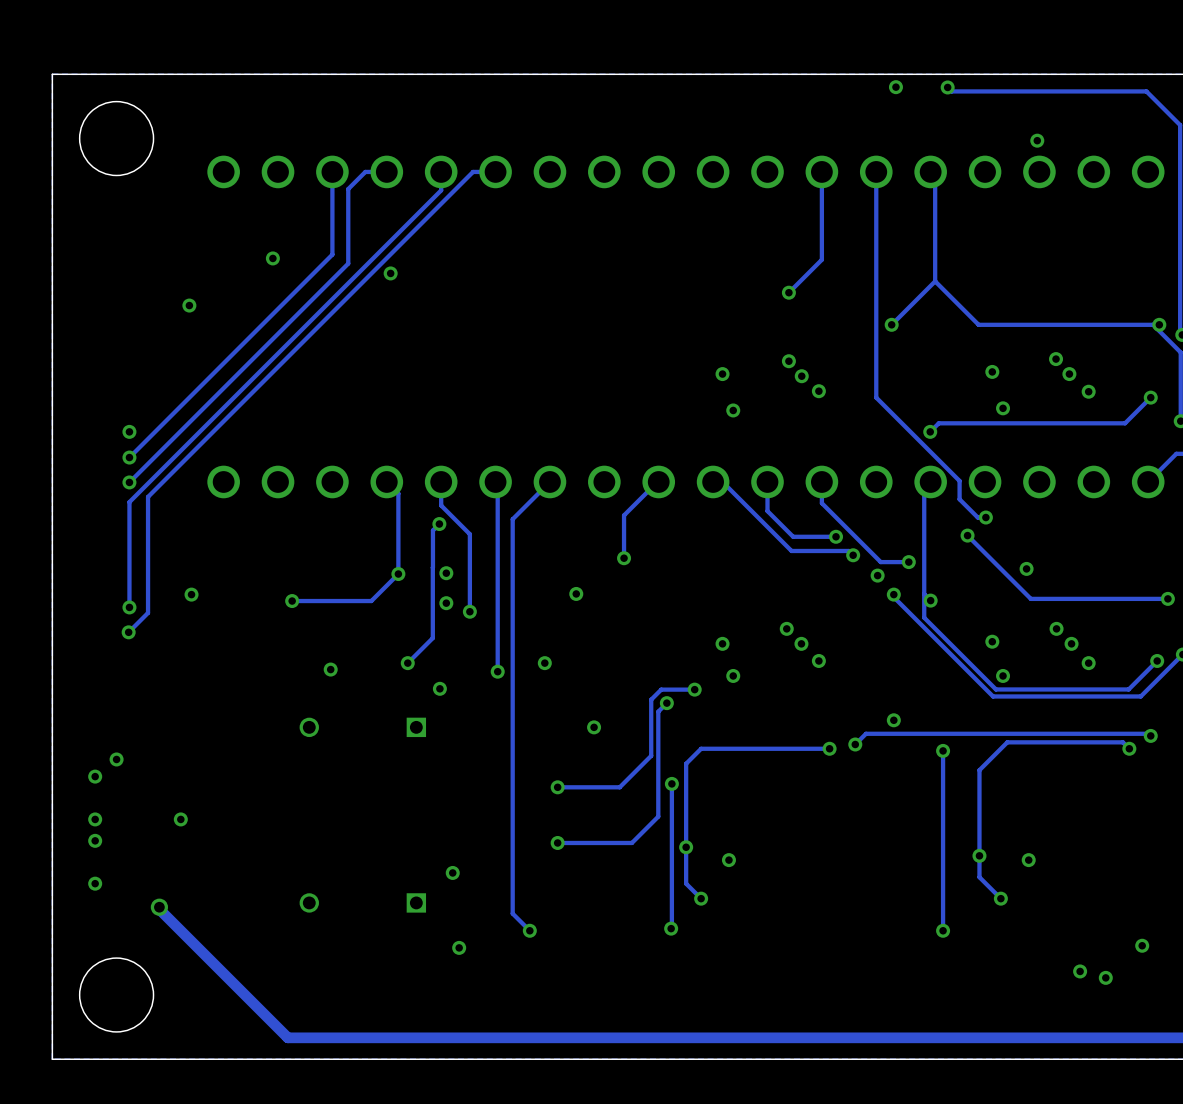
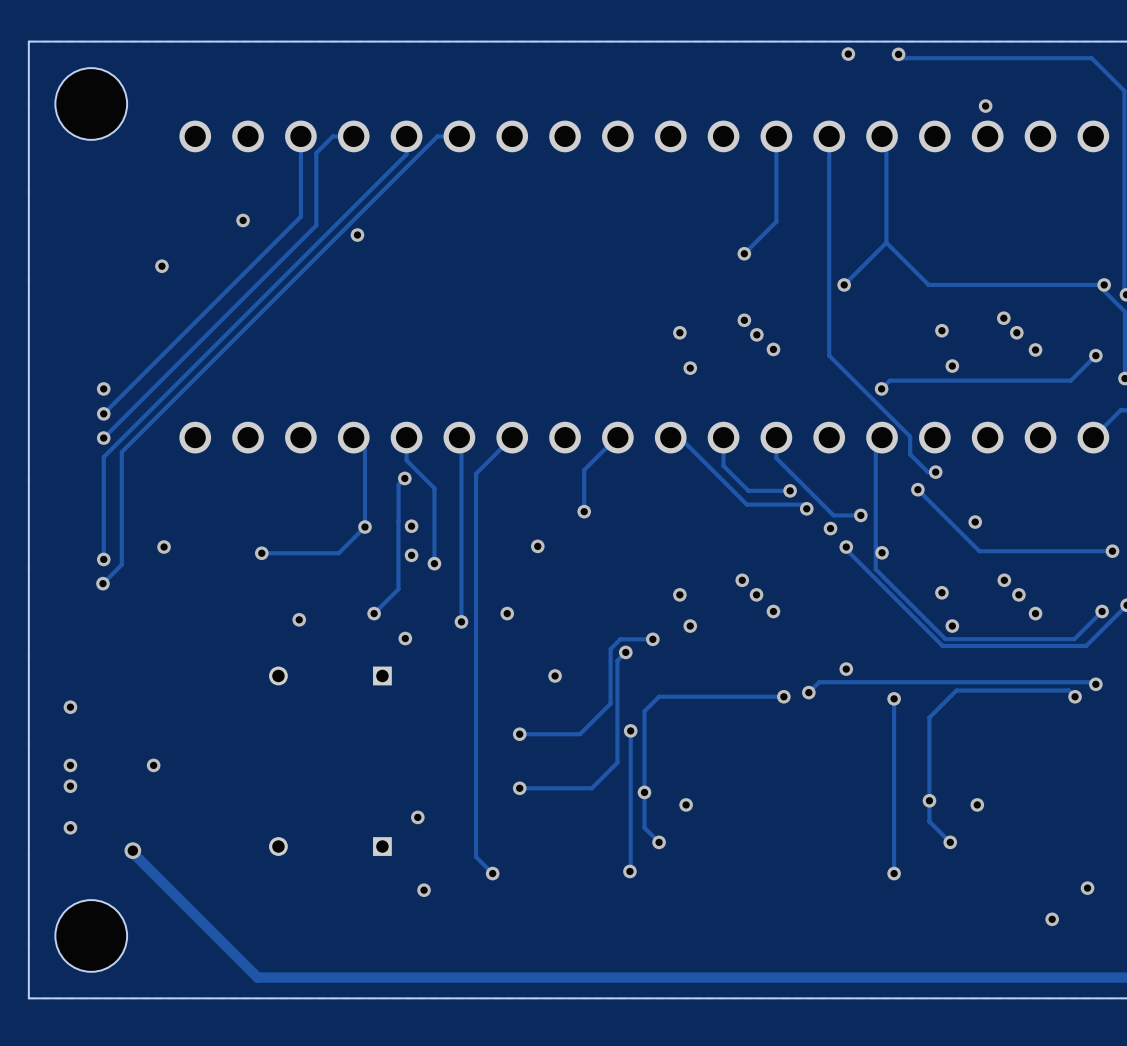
via: none -> (70, 707)
via: (116, 759) -> none
via: (95, 776) -> none
via: (1080, 971) -> none

